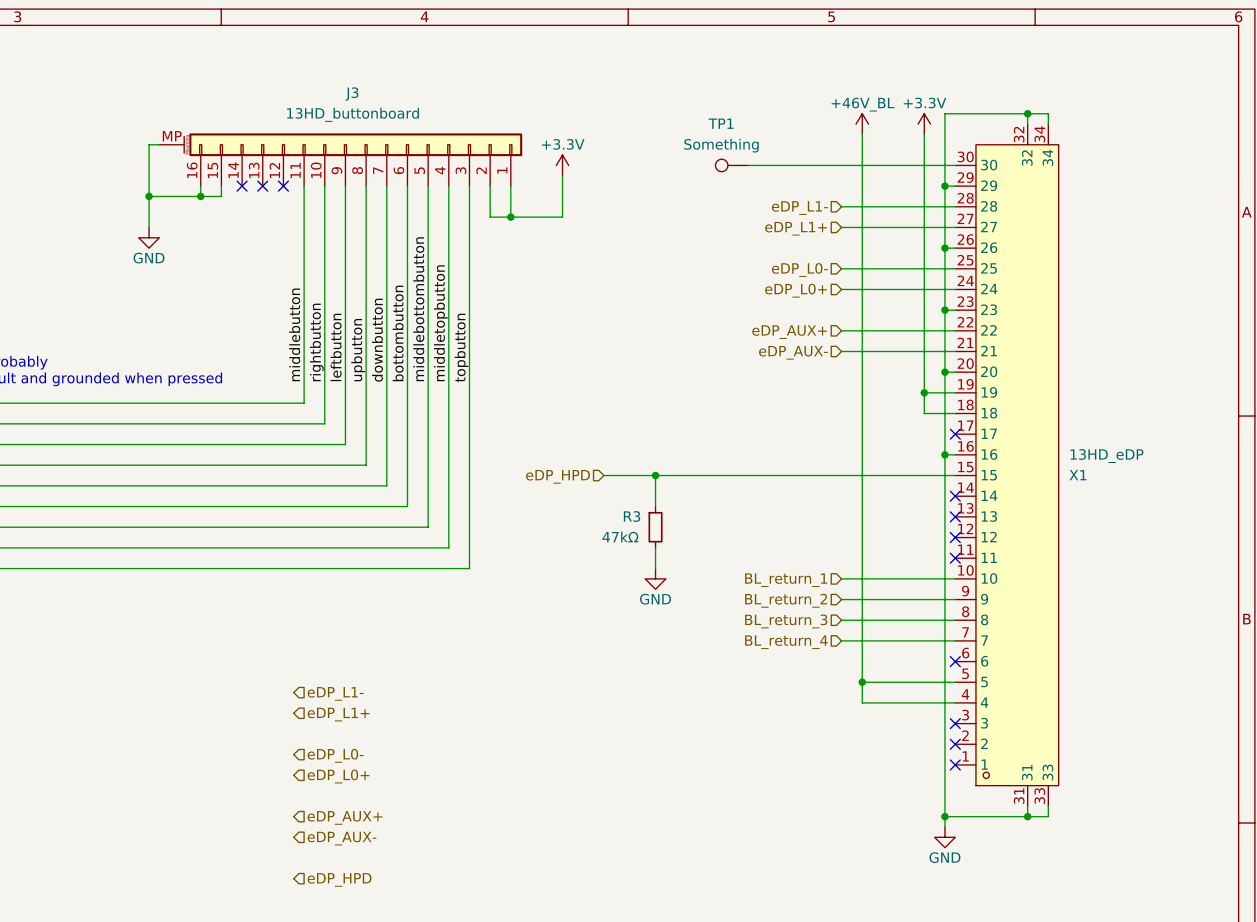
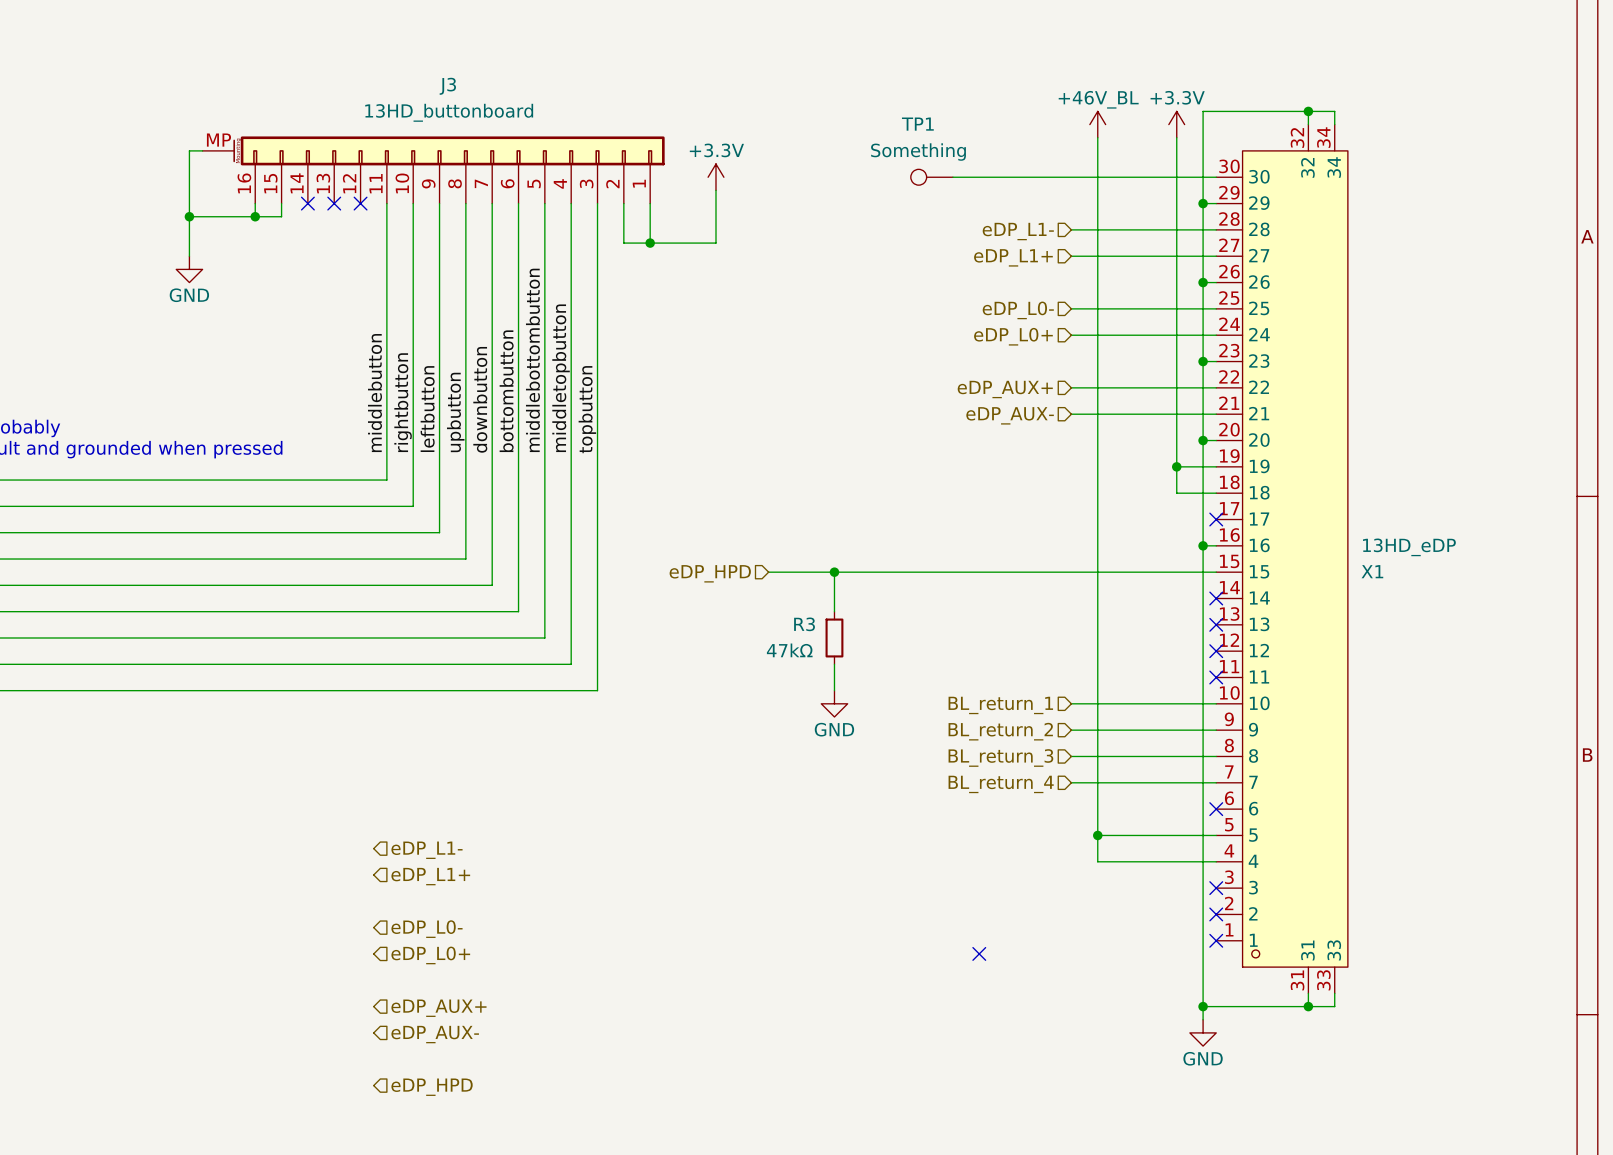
no-connect mark: none -> (979, 953)

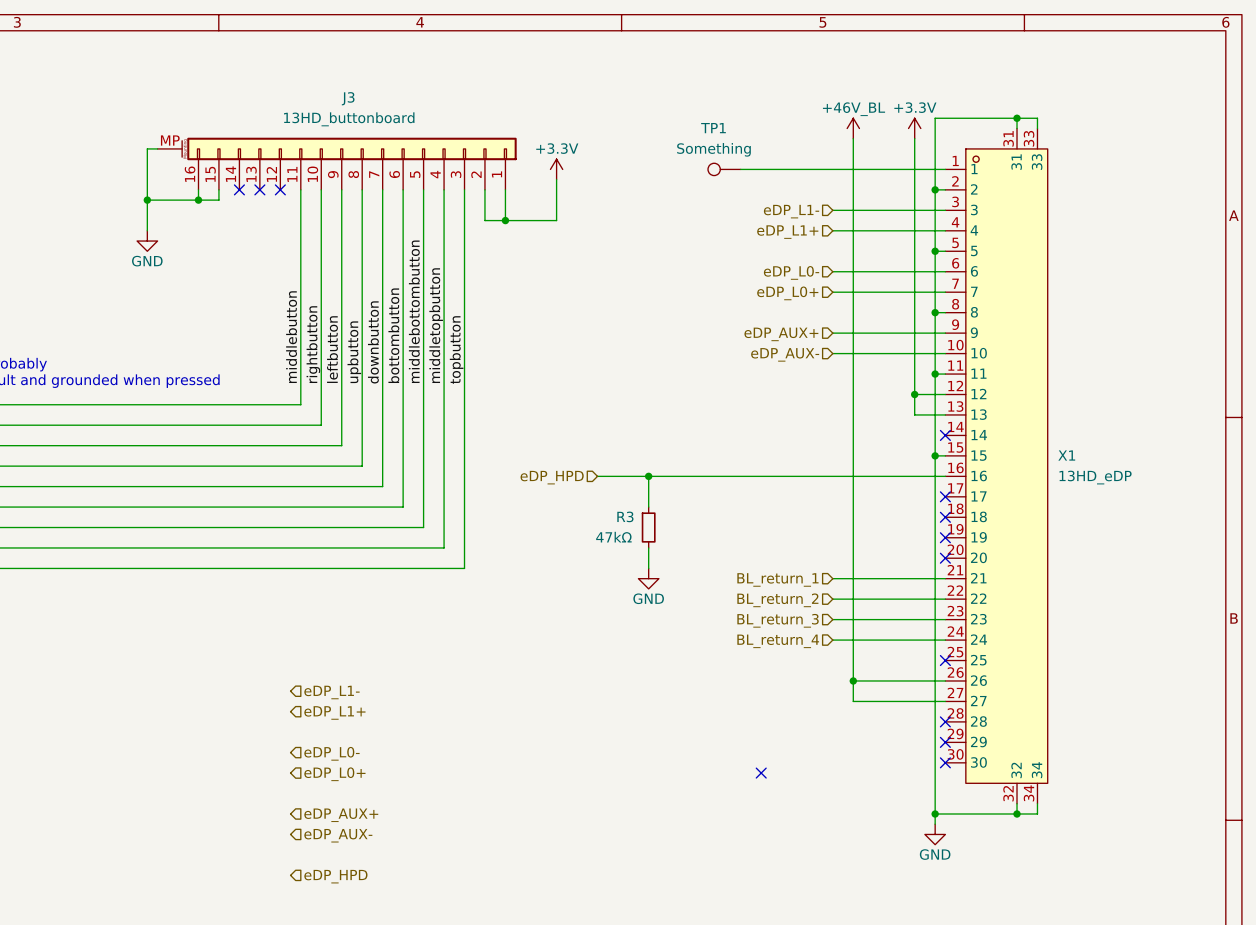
X1 flip: as is (1295, 559) -> up-down (1006, 466)

